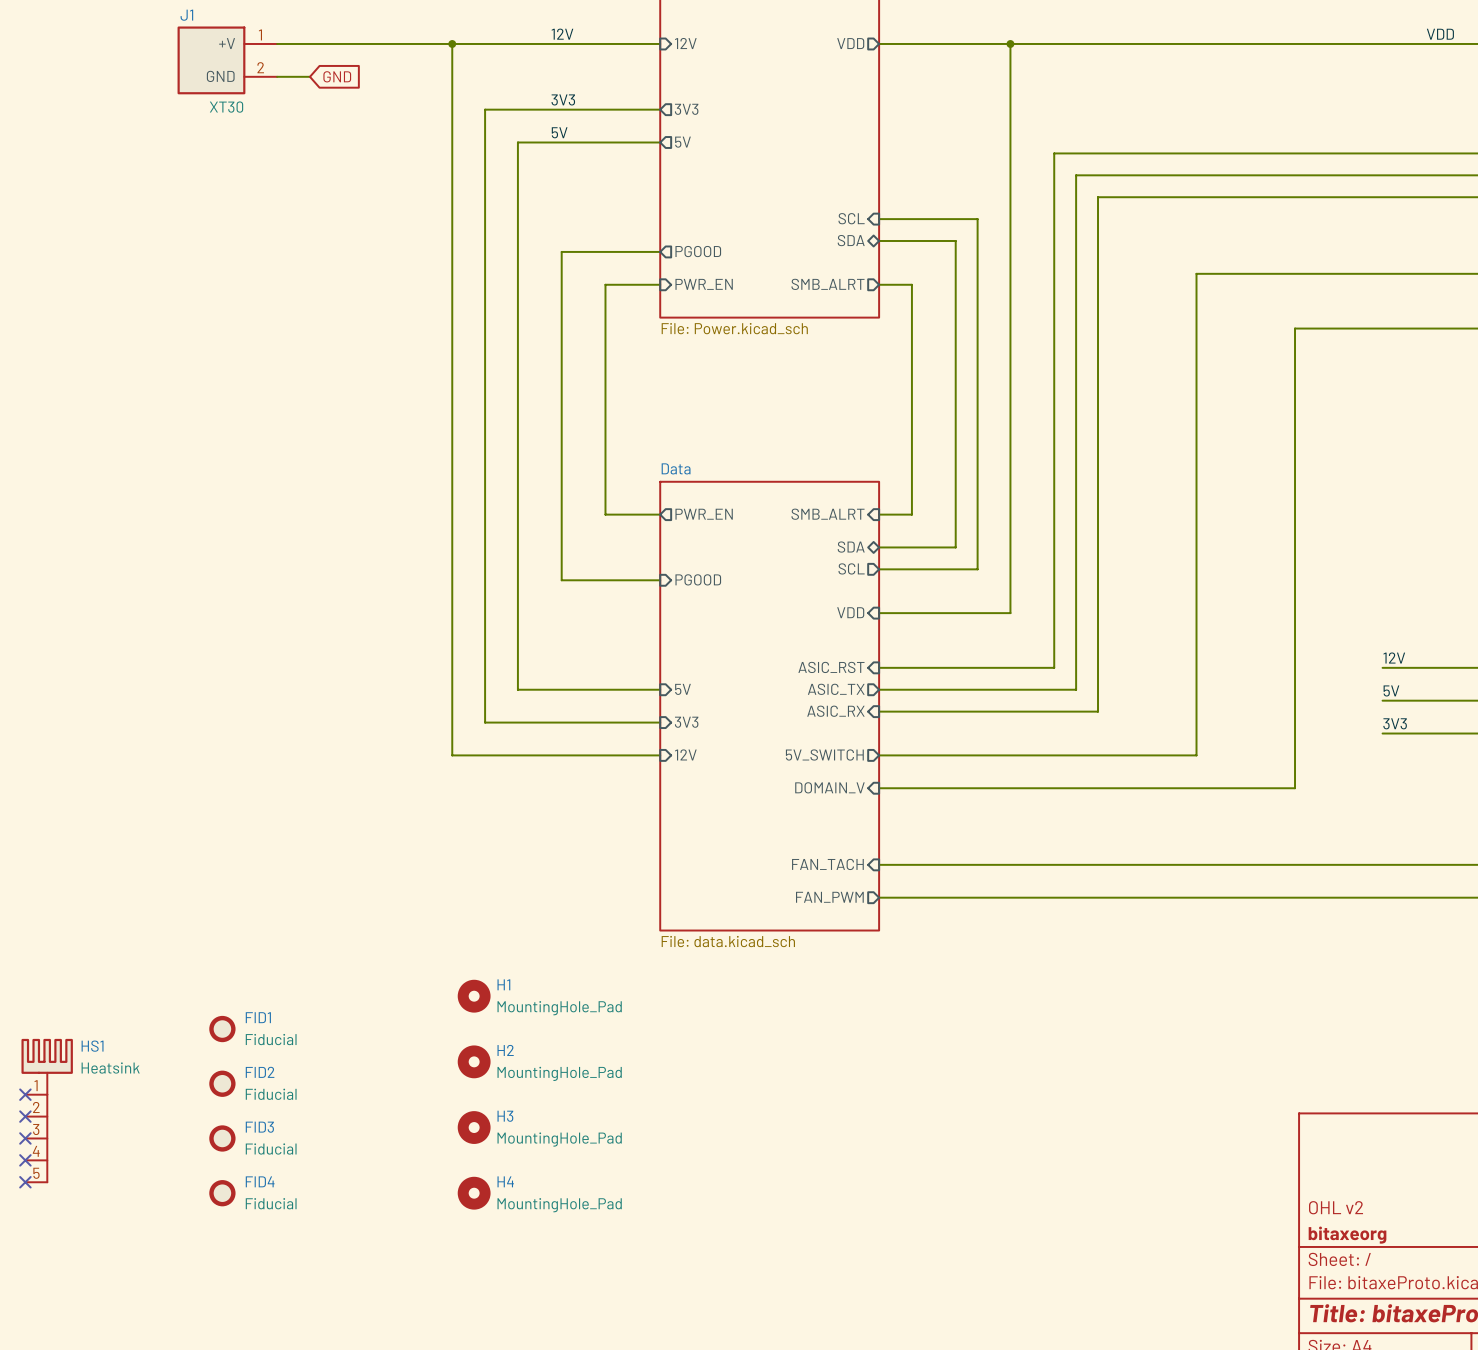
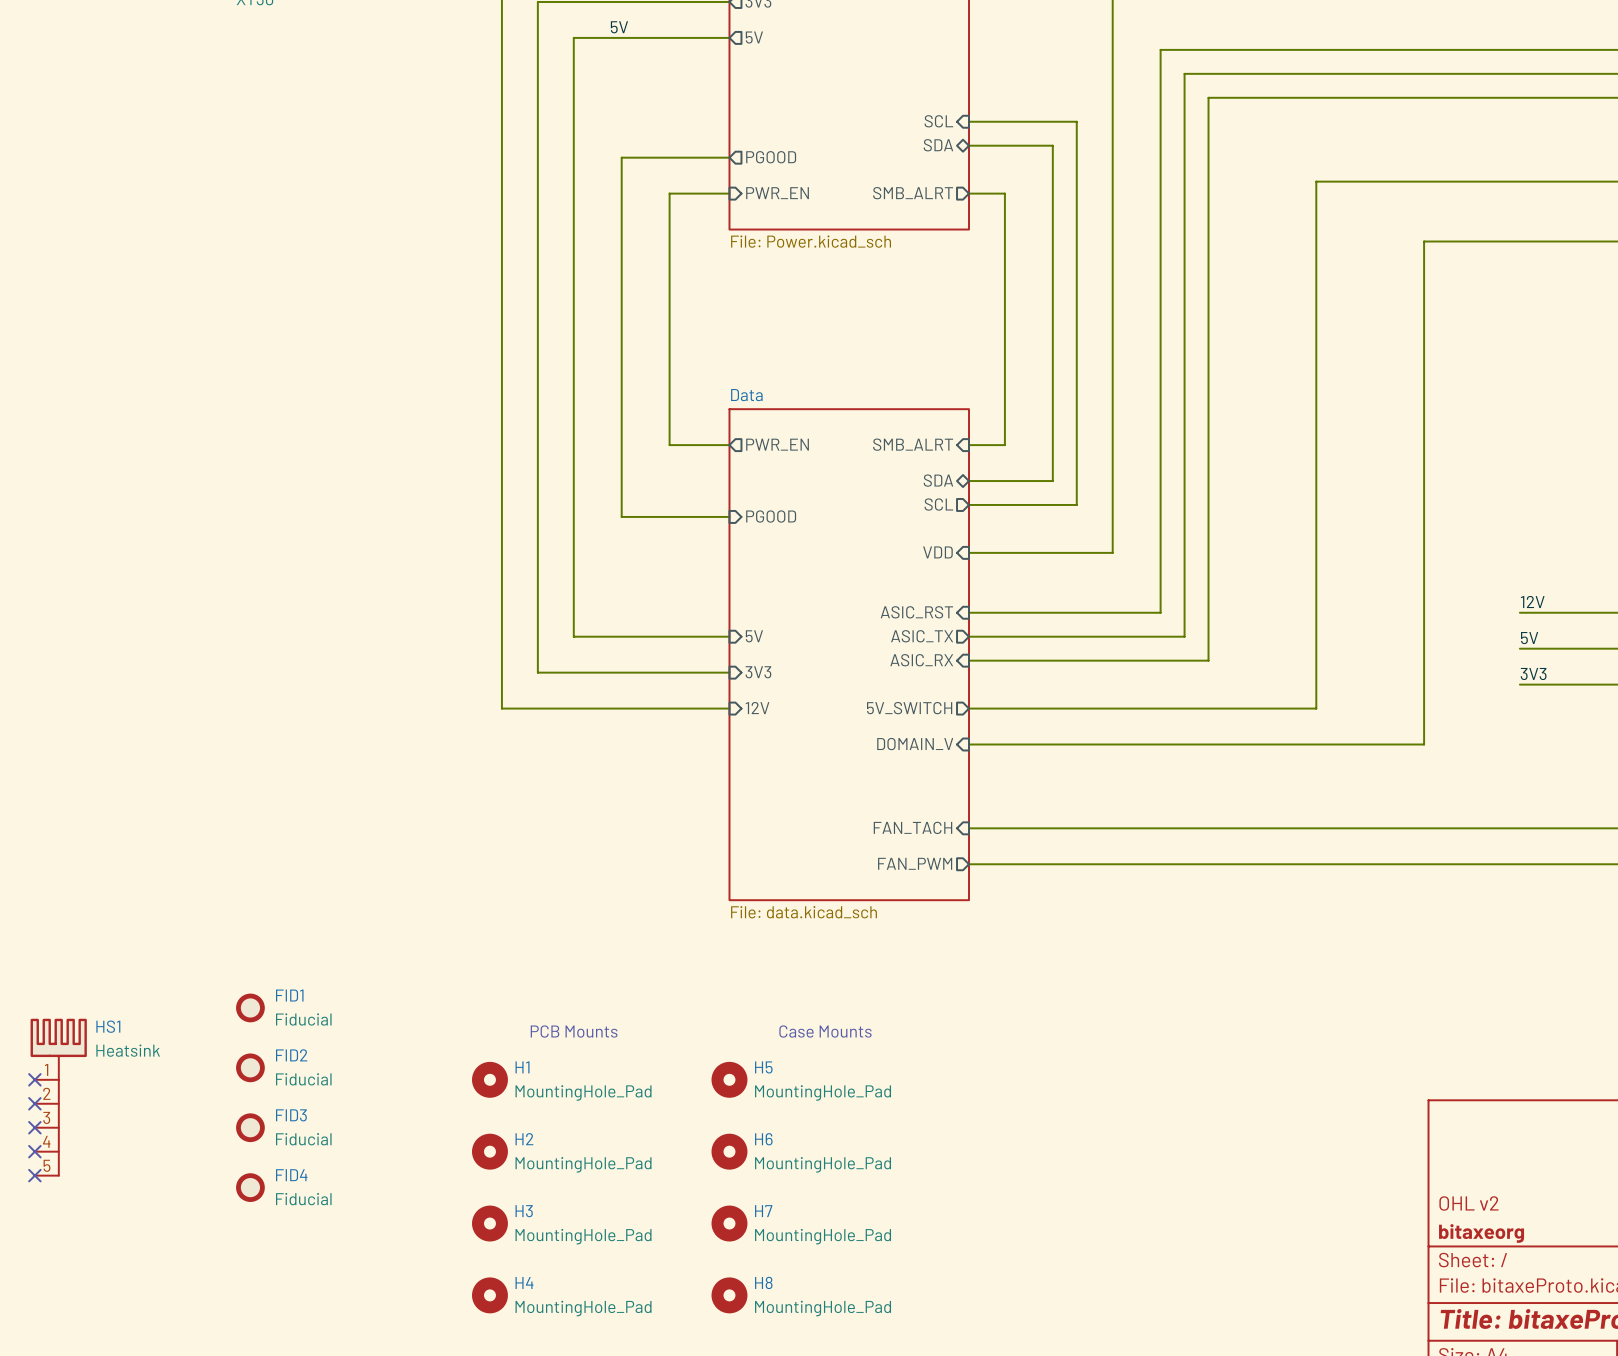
H1 position: (474, 996) -> (489, 1079)
text: none -> PCB Mounts (574, 1031)
text: none -> Case Mounts (825, 1031)
H2 position: (474, 1061) -> (489, 1151)
H5: none -> MountingHole_Pad (729, 1079)
H3 position: (474, 1127) -> (489, 1223)
H6: none -> MountingHole_Pad (729, 1151)
H4 position: (474, 1193) -> (489, 1295)
H7: none -> MountingHole_Pad (729, 1223)
H8: none -> MountingHole_Pad (729, 1295)

